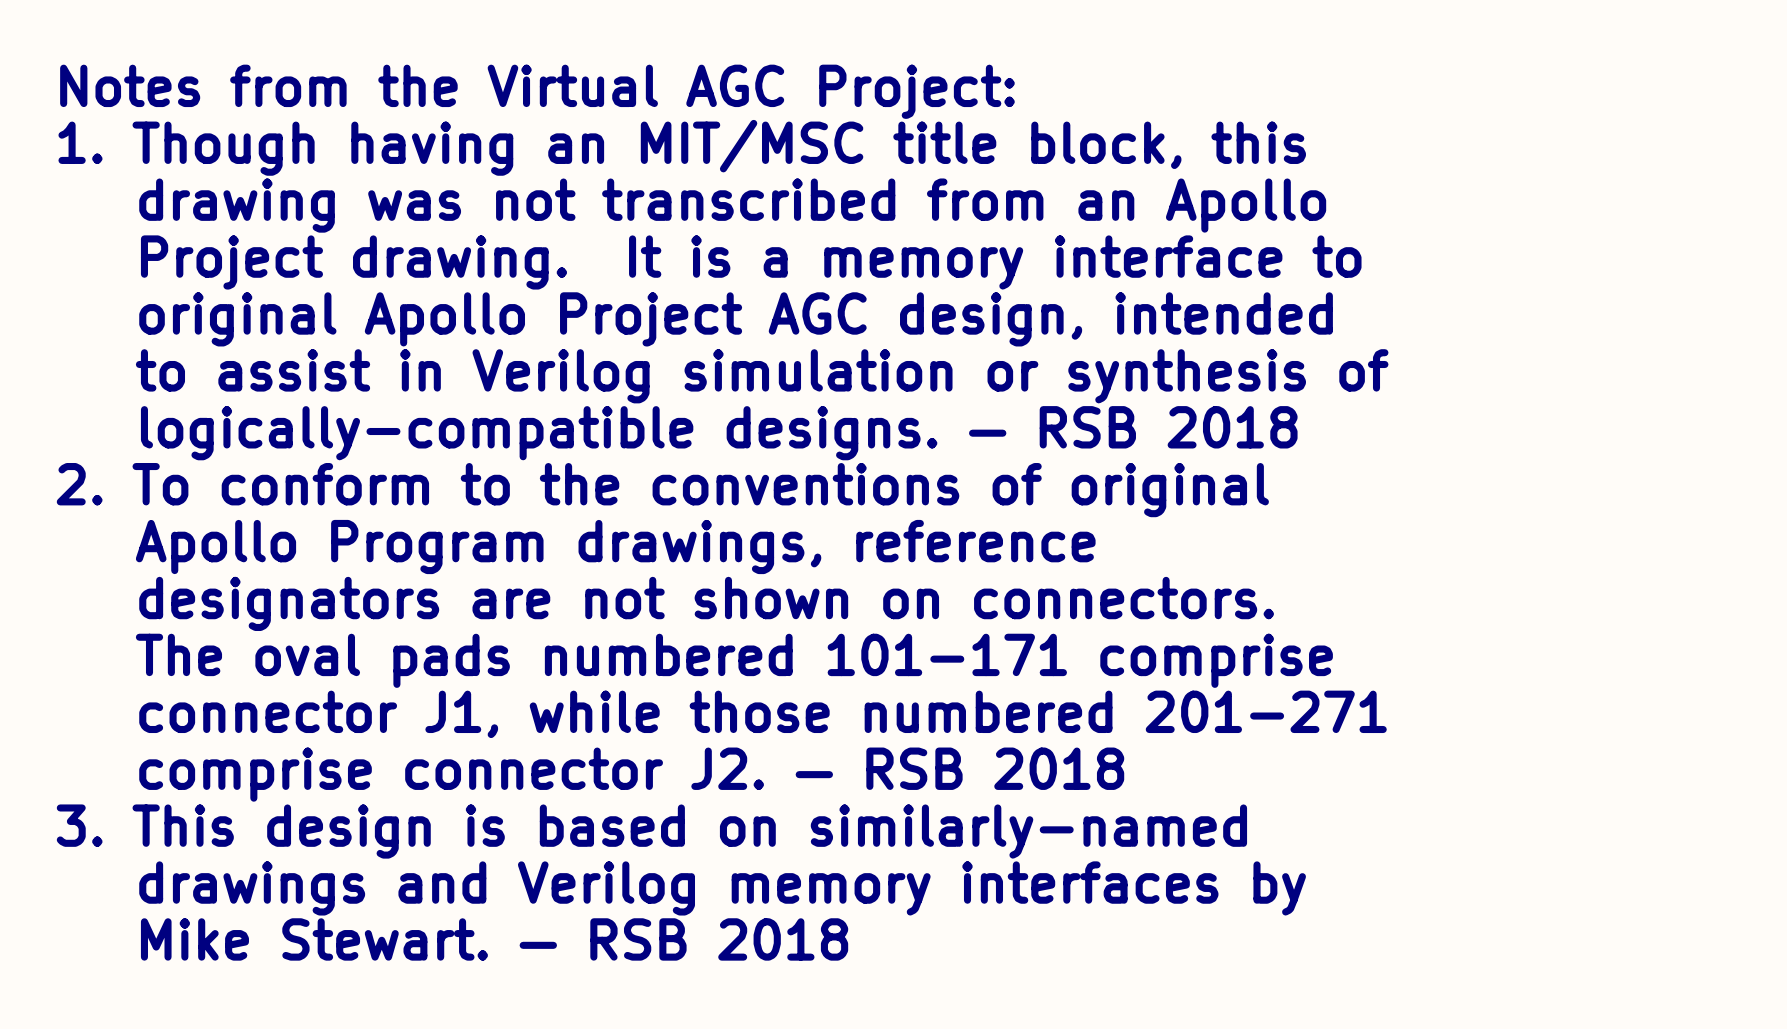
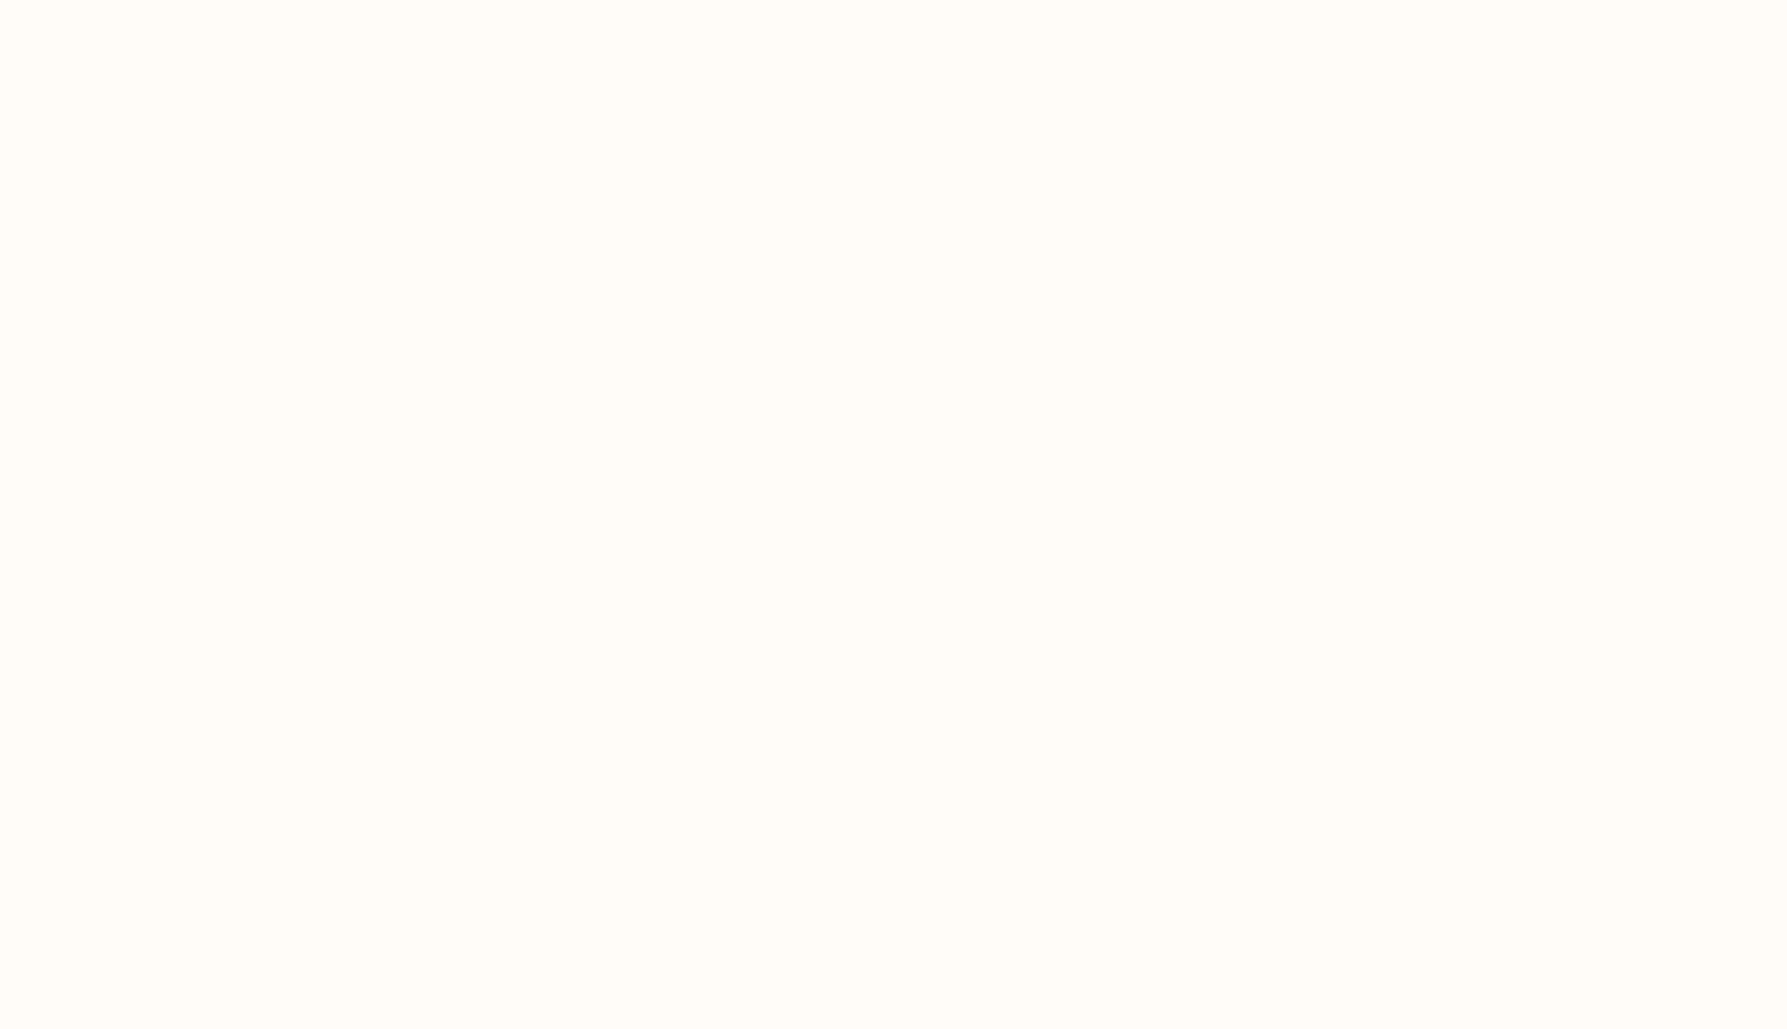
text: Notes from the Virtual AGC Project: (537, 91) -> none
text: 1. Though having an MIT/MSC title block, this (682, 147) -> none
text: drawing was not transcribed from an Apollo (732, 205) -> none
text: Project drawing. It is a memory interface to (751, 262) -> none
text: original Apollo Project AGC design, intended (736, 319) -> none
text: to assist in Verilog simulation or synthesis of (762, 376) -> none
text: logically-compatible designs. — RSB 2018 (719, 433) -> none
text: 2. To conform to the conventions of original (662, 490) -> none
text: Apollo Program drawings, reference (615, 547) -> none
text: designators are not shown on connectors. (706, 603) -> none
text: The oval pads numbered 101-171 comprise (734, 660) -> none
text: connector J1, while those numbered 201-271 (763, 714) -> none
text: comprise connector J2. — RSB 2018 (631, 774) -> none
text: 3. This design is based on similarly-named (651, 831) -> none
text: drawings and Verilog memory interfaces by (722, 888) -> none
text: Mike Stewart. — RSB 2018 (494, 939) -> none

